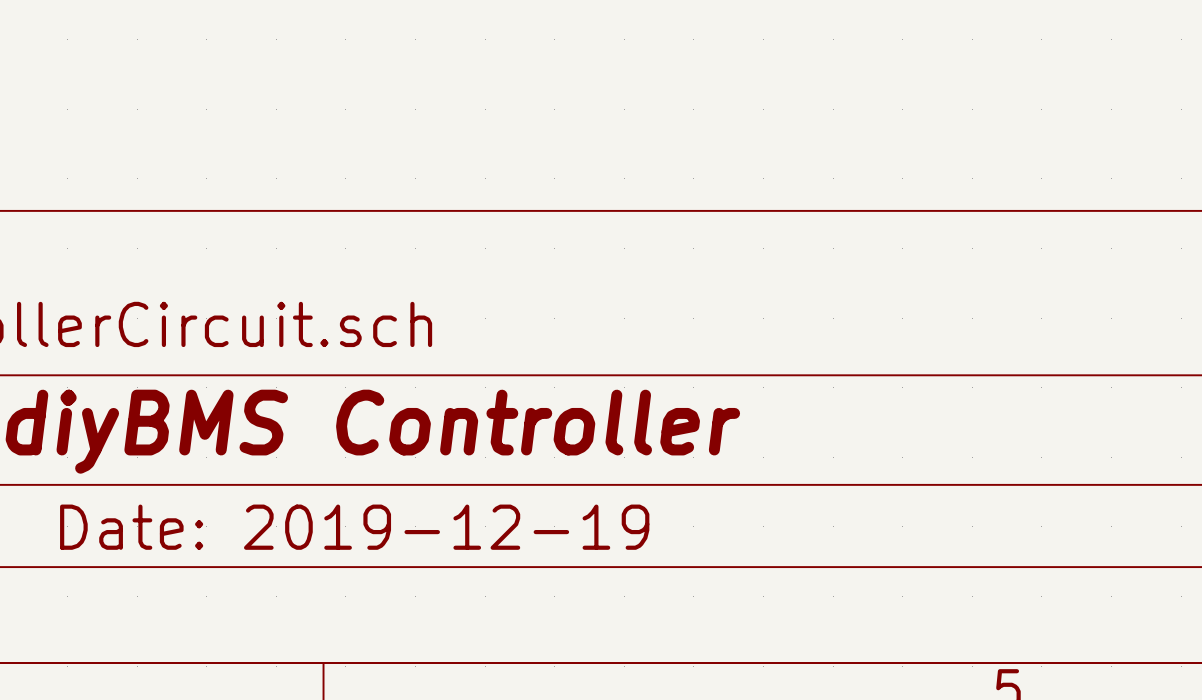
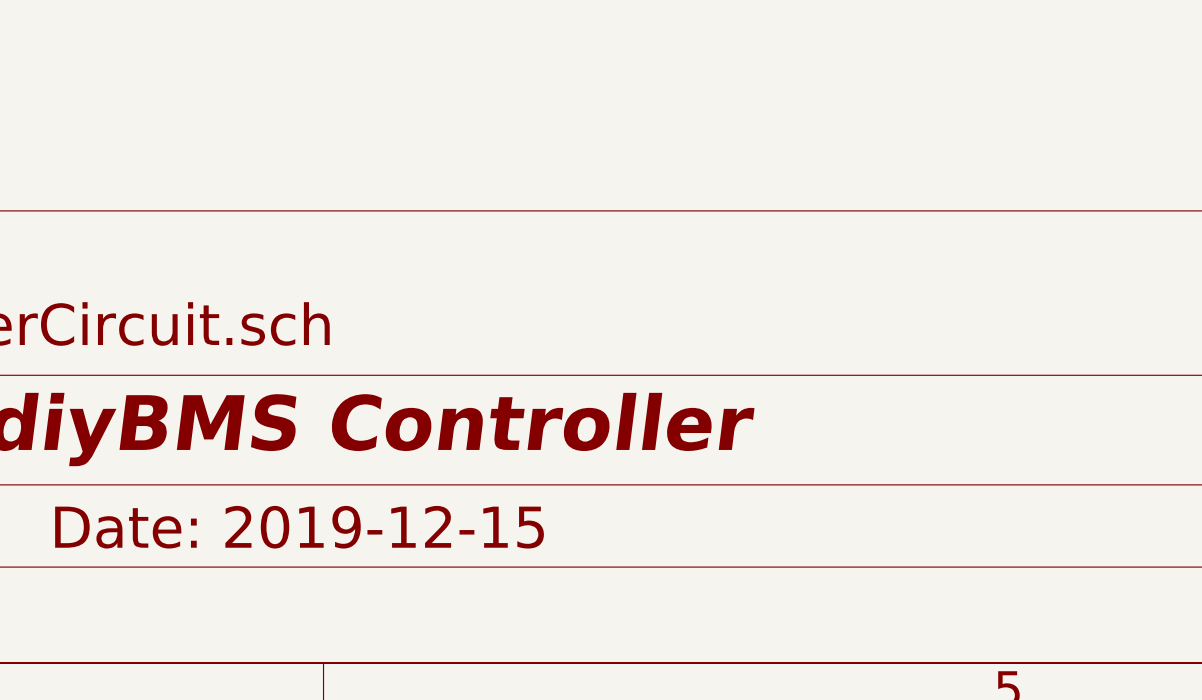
title block: Date: 2019-12-19 (354, 527) -> Date: 2019-12-15 (299, 527)

